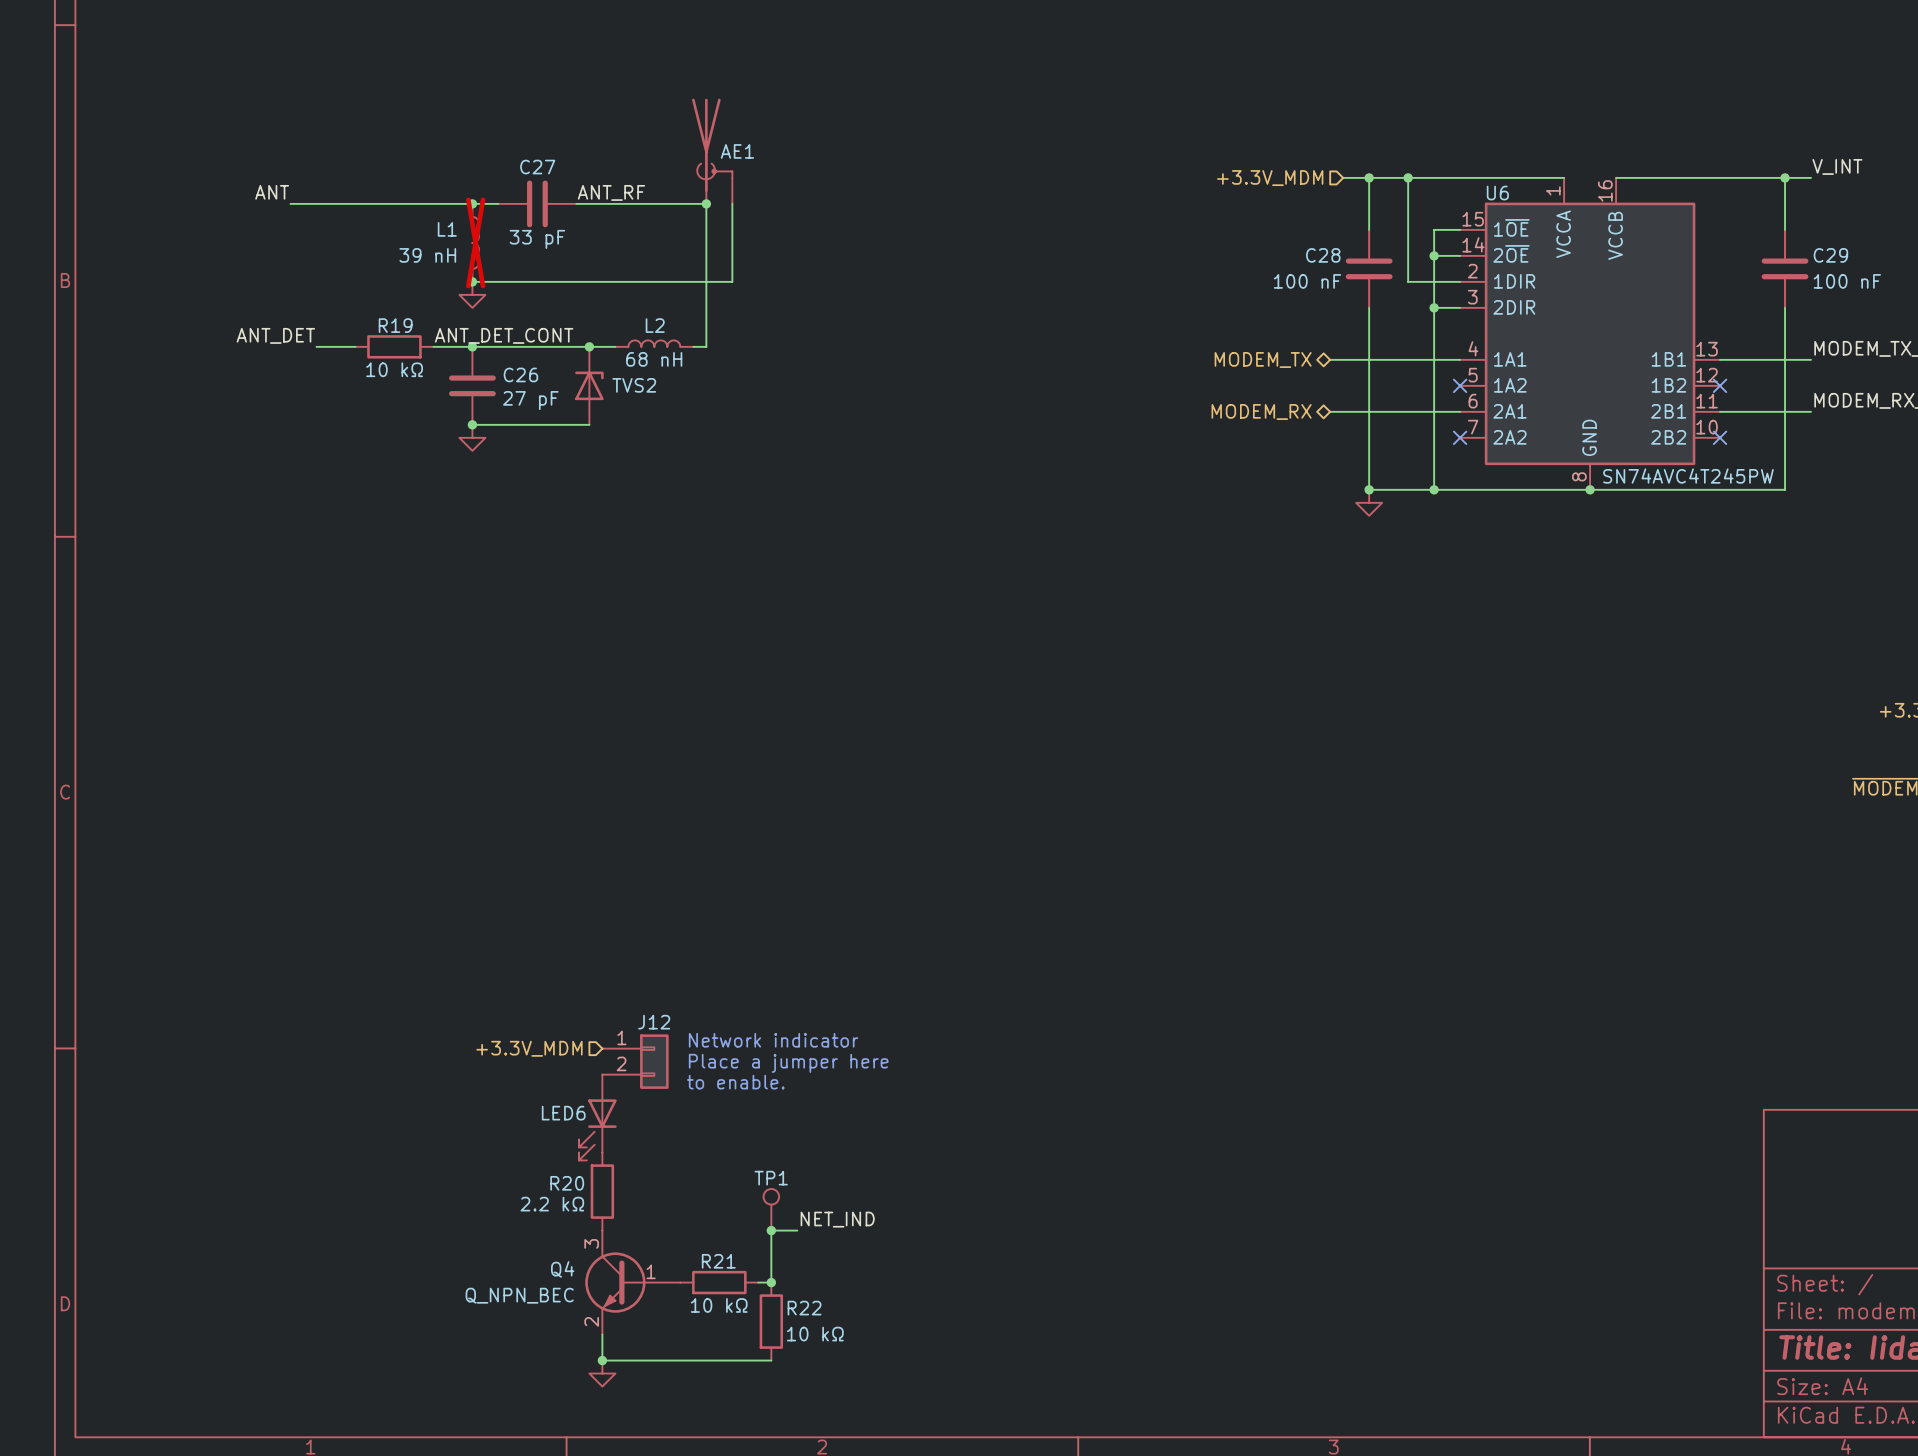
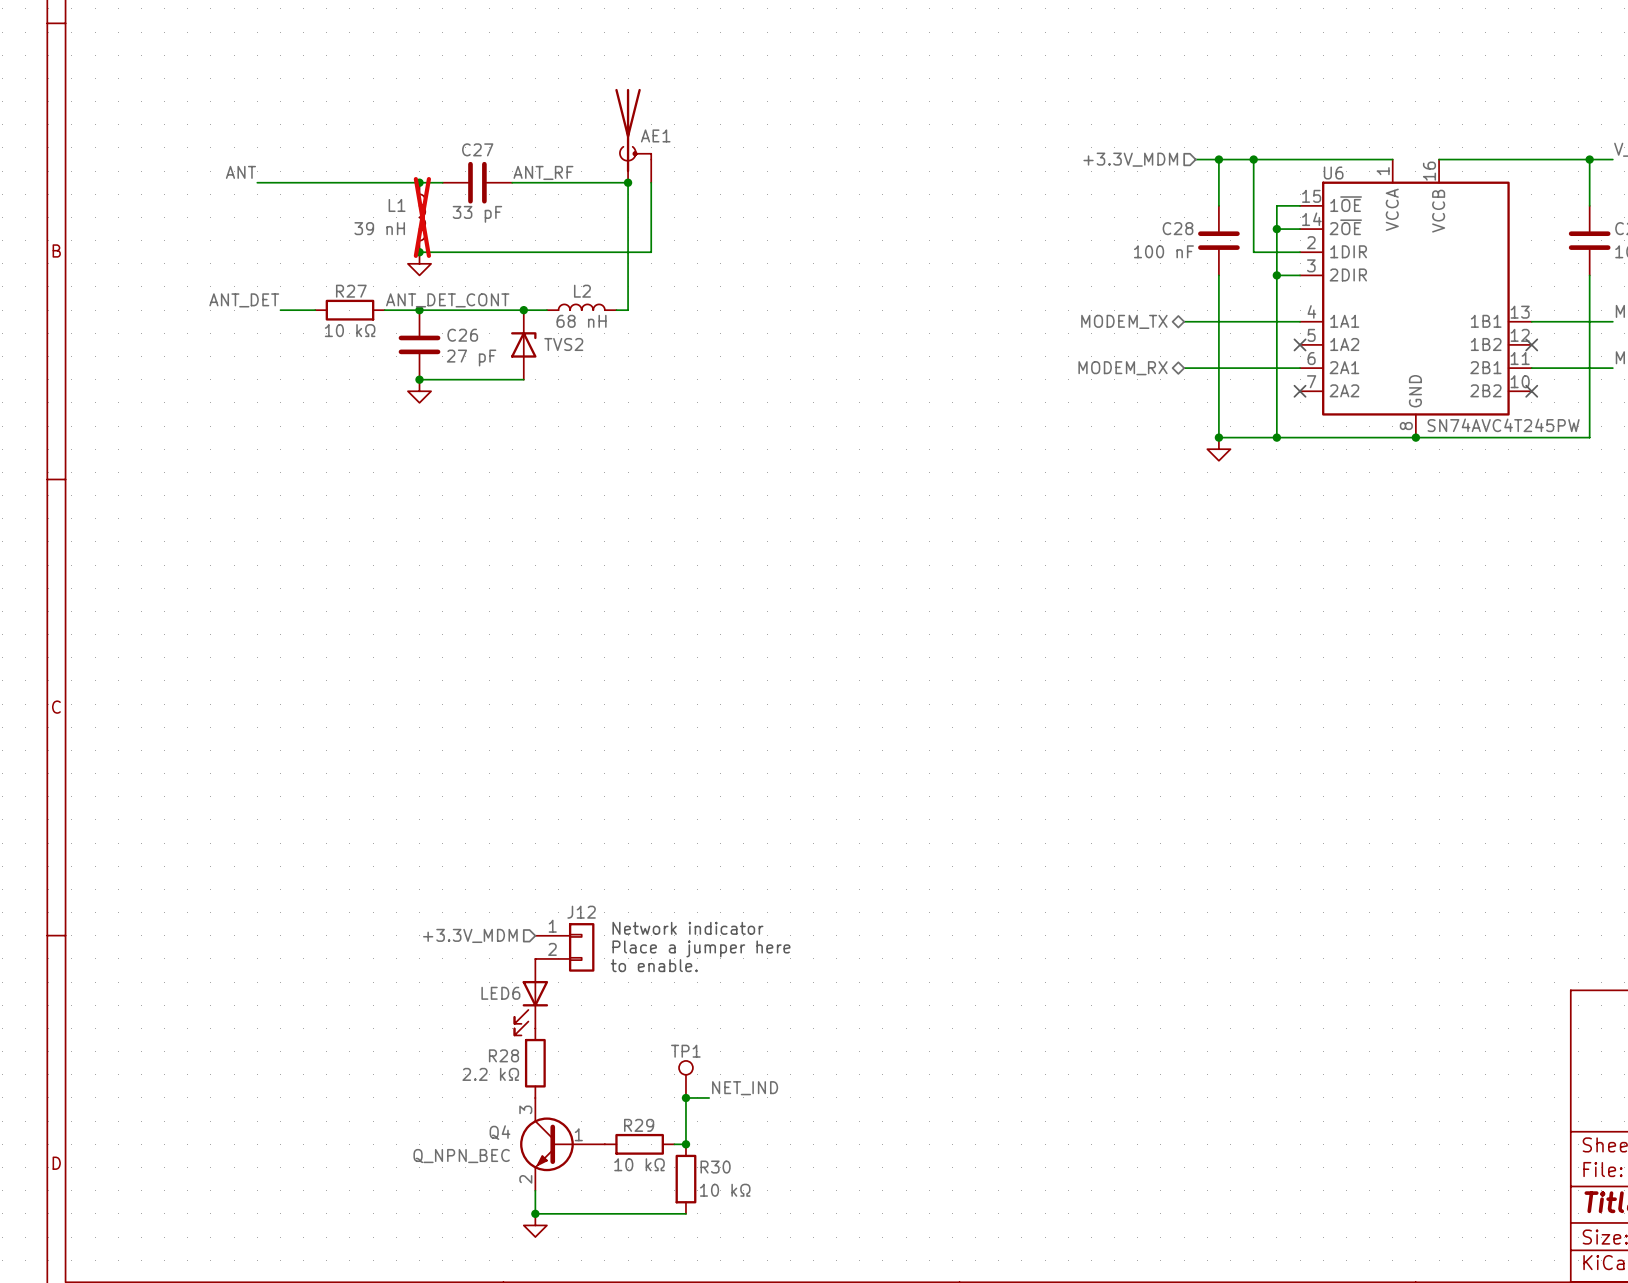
R19 name: R19 (395, 325) -> R27 (351, 291)
R20 name: R20 (567, 1183) -> R28 (504, 1055)
R21 name: R21 (718, 1261) -> R29 (639, 1125)
R22 name: R22 (804, 1308) -> R30 (715, 1167)

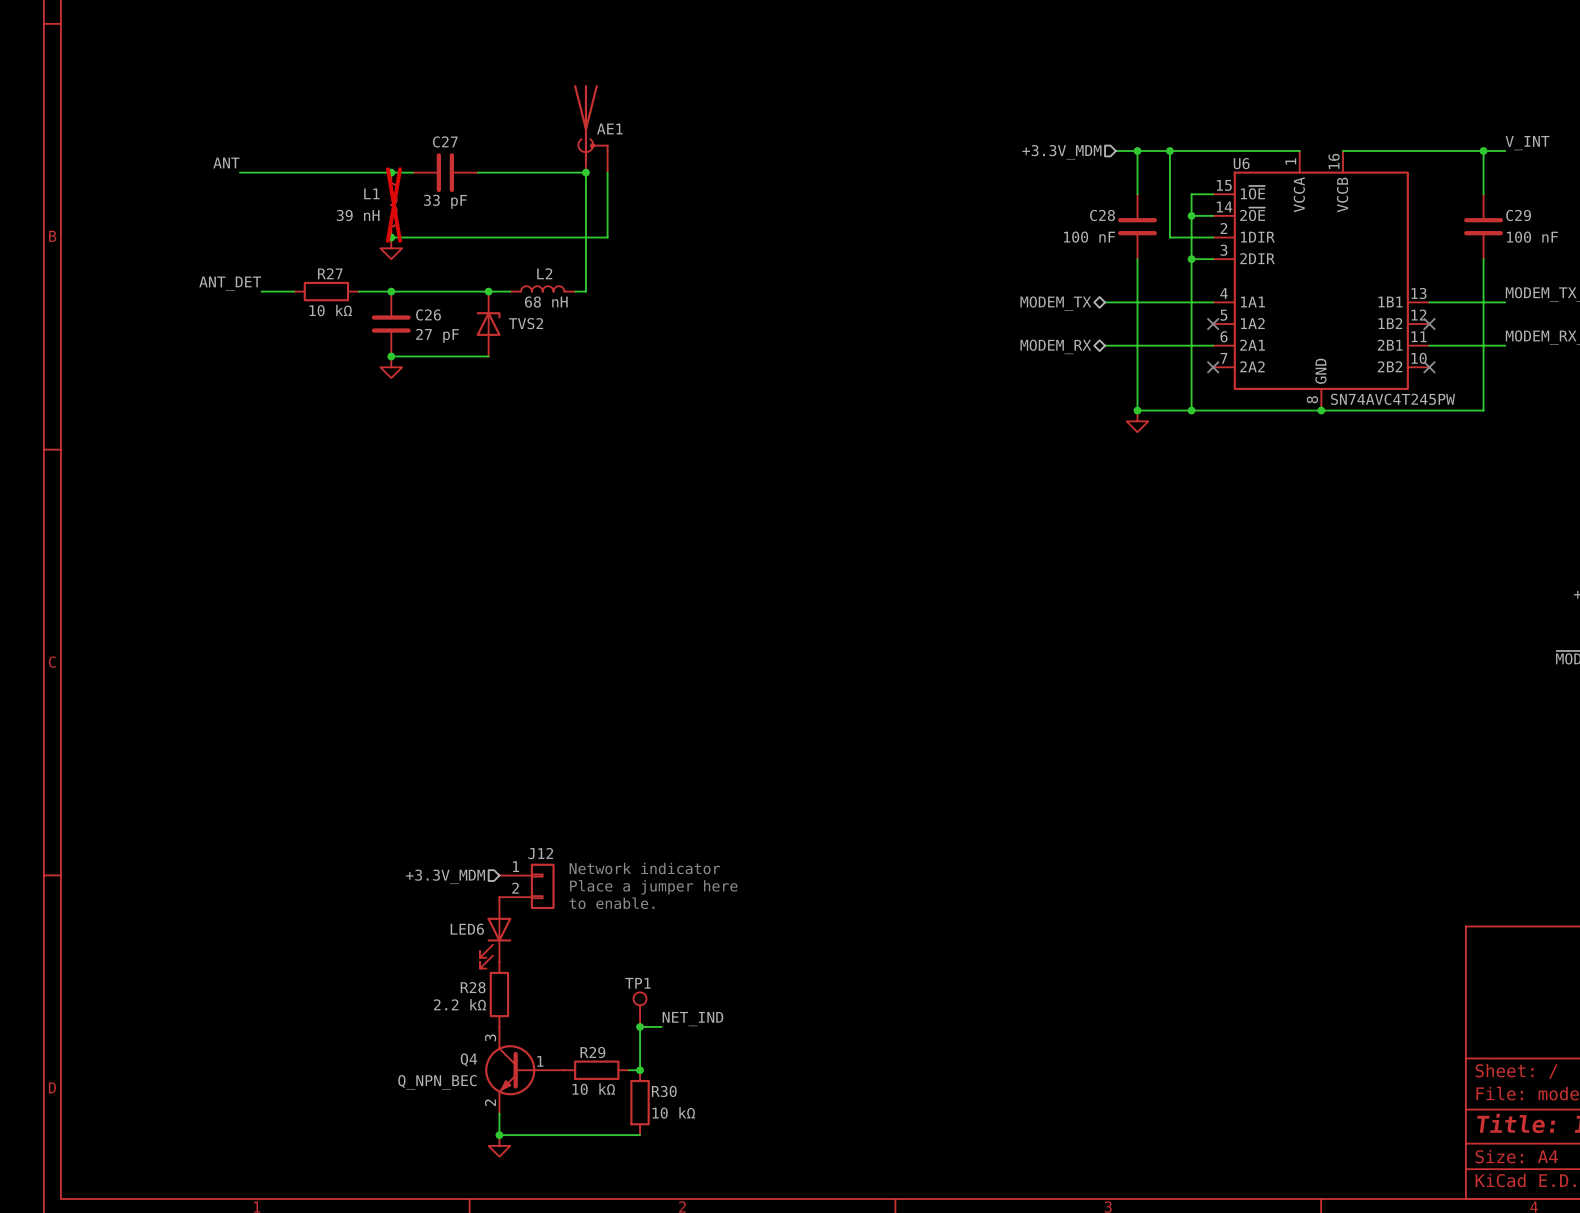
label: ANT_RF (543, 172) -> none
label: ANT_DET_CONT (447, 300) -> none

